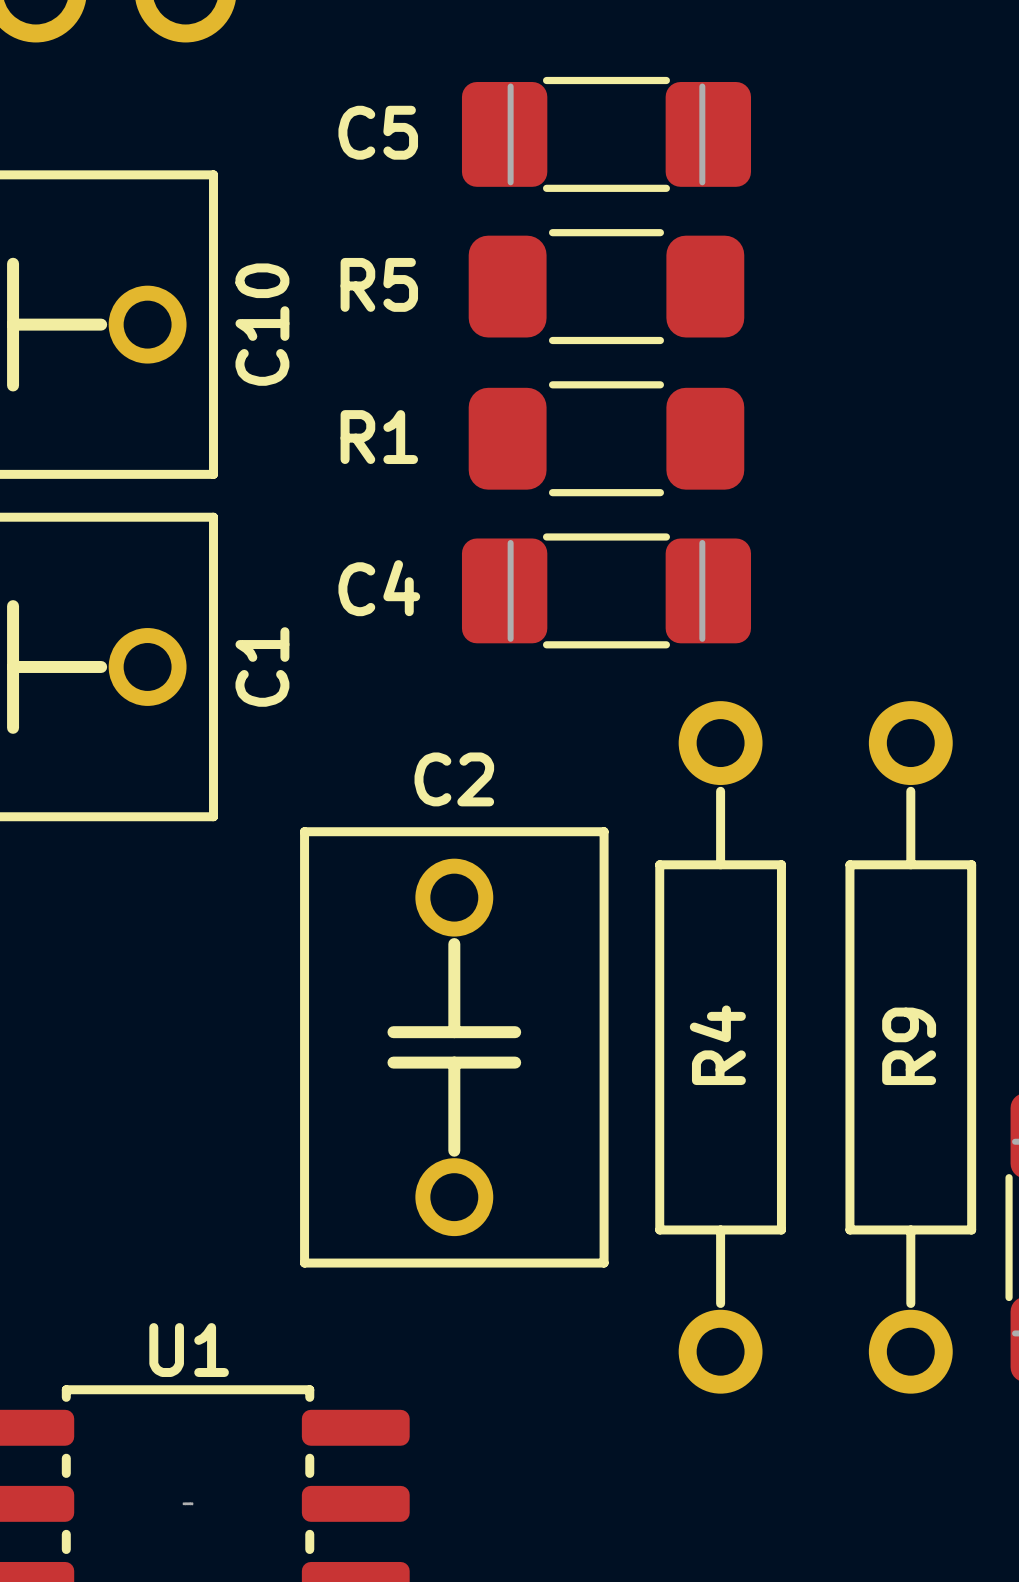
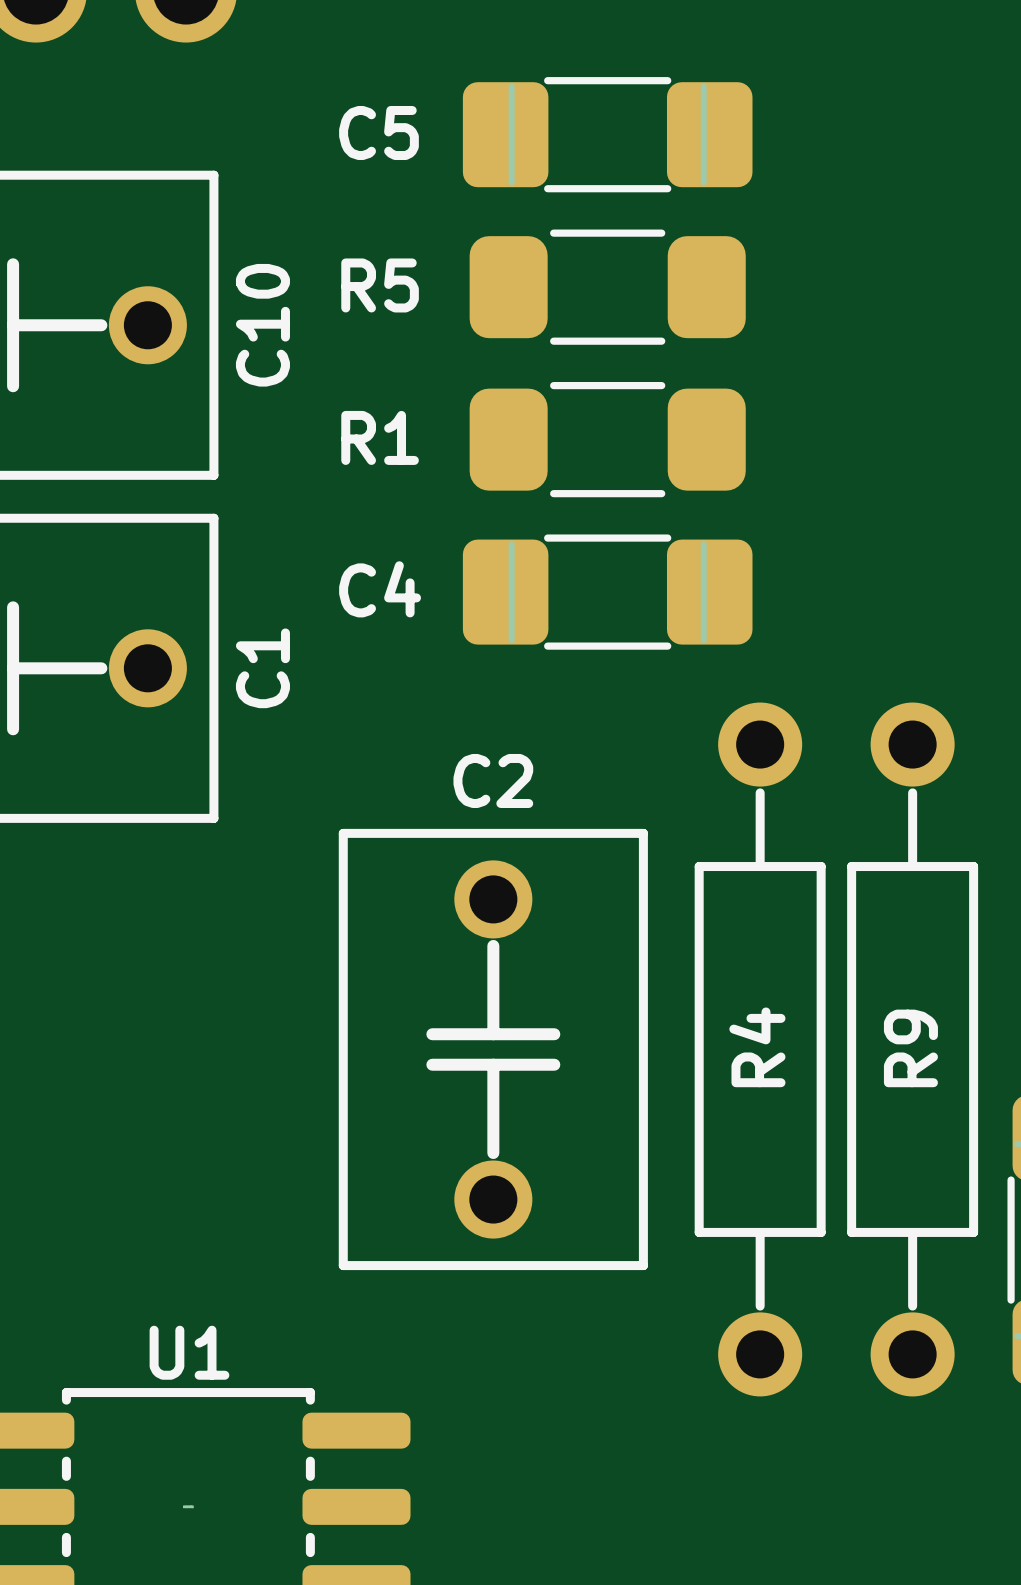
C2 position: (454, 1047) -> (493, 1049)
R4 position: (720, 1047) -> (760, 1049)

